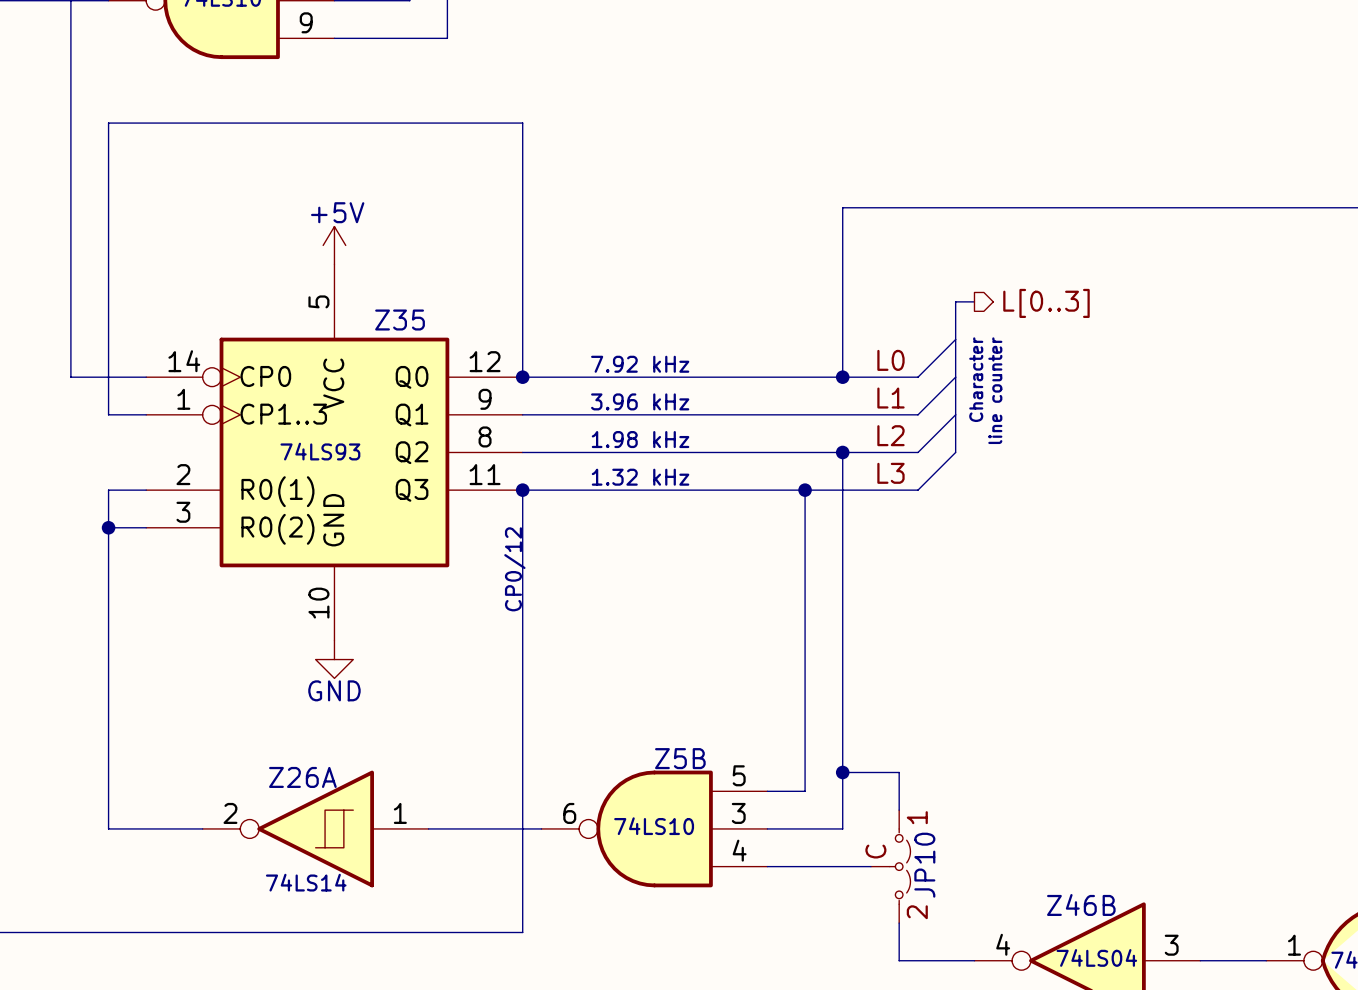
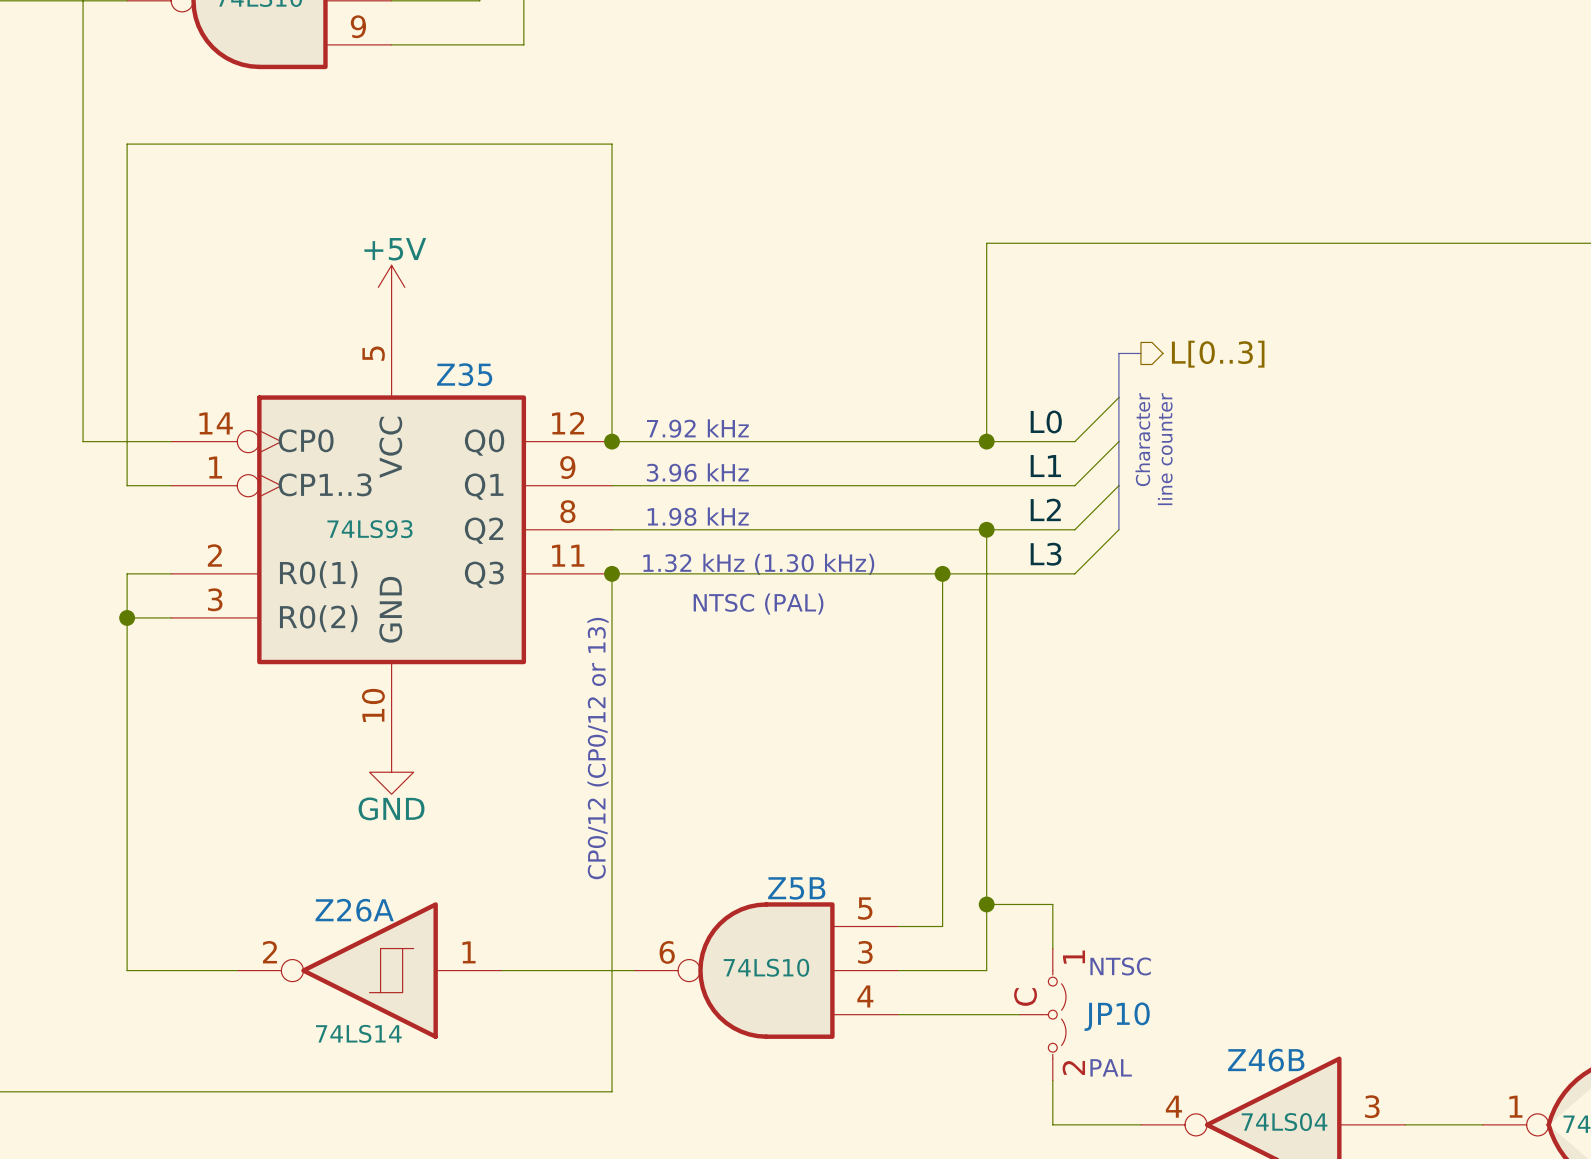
text position: 7.92 kHz (640, 364) -> 7.92 kHz (697, 428)
text position: 3.96 kHz (640, 401) -> 3.96 kHz (697, 472)
text position: 1.98 kHz (640, 439) -> 1.98 kHz (698, 516)
text: 1.32 kHz (640, 477) -> none
text: none -> 1.32 kHz (1.30 kHz) (758, 564)
text: none -> NTSC (PAL) (758, 604)
text: CP0/12 (514, 569) -> CP0/12 (CP0/12 or 13) (598, 748)
text: none -> NTSC (1120, 966)
JP10 name rotation: 0° (924, 865) -> 90° clockwise (1117, 1016)
text: none -> PAL (1111, 1067)

